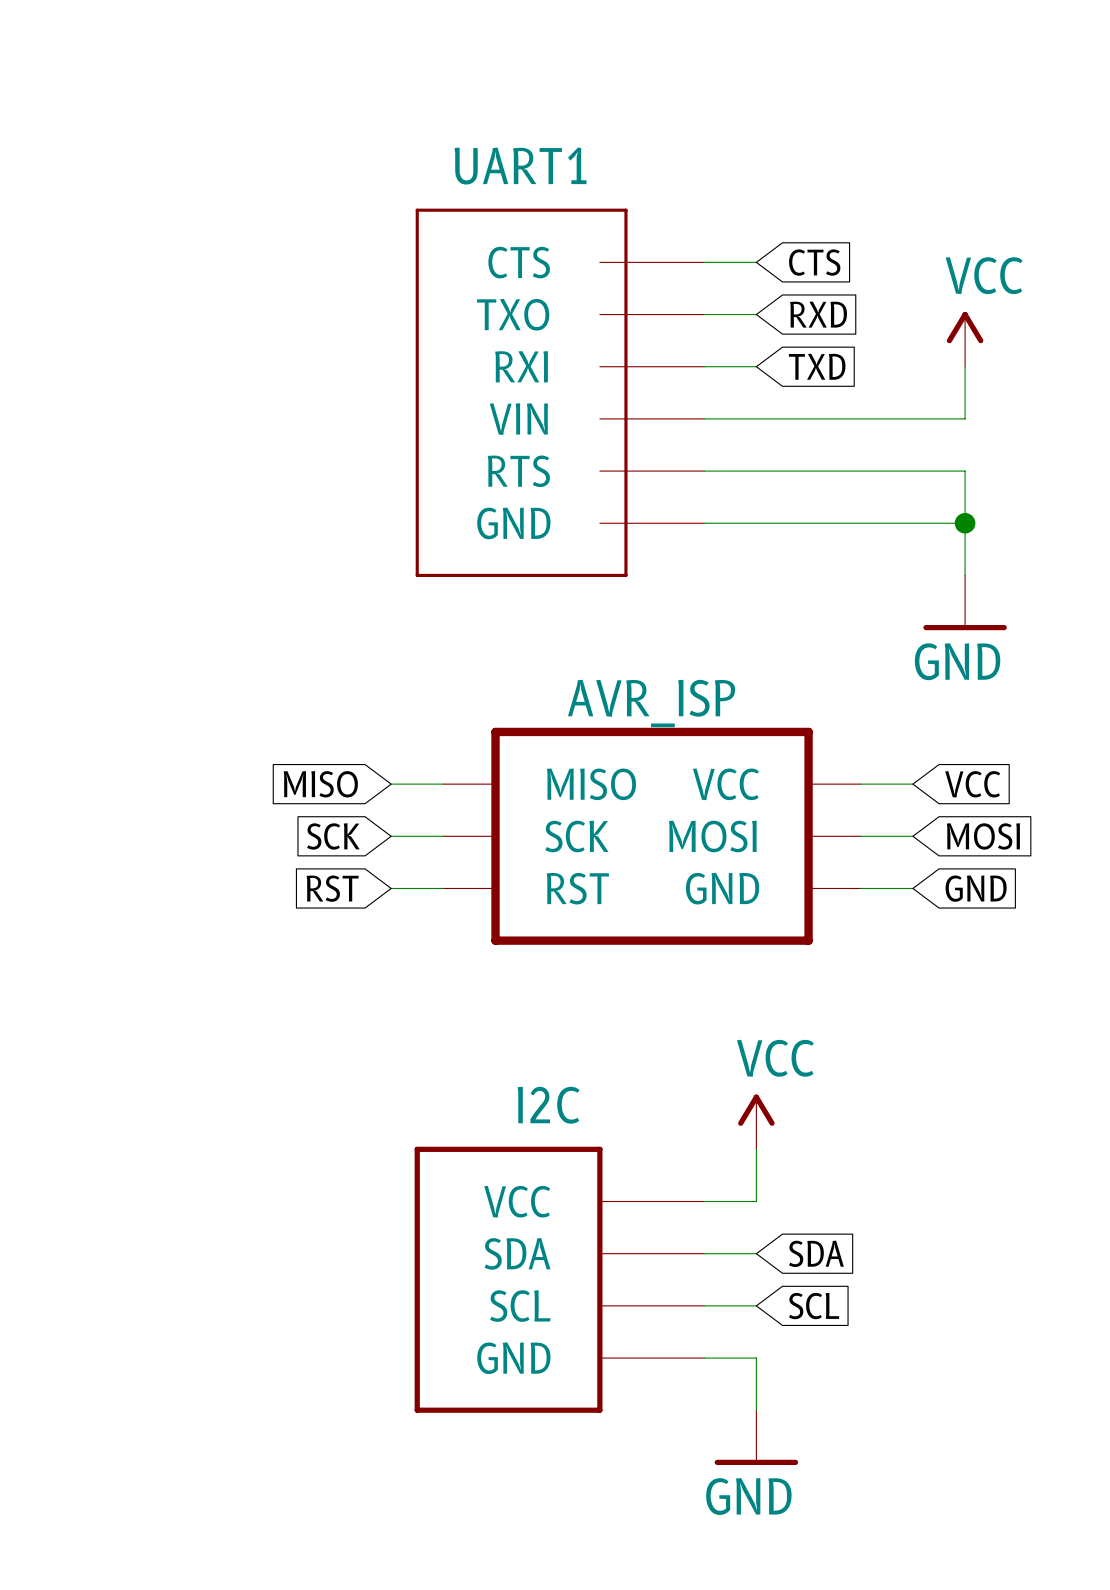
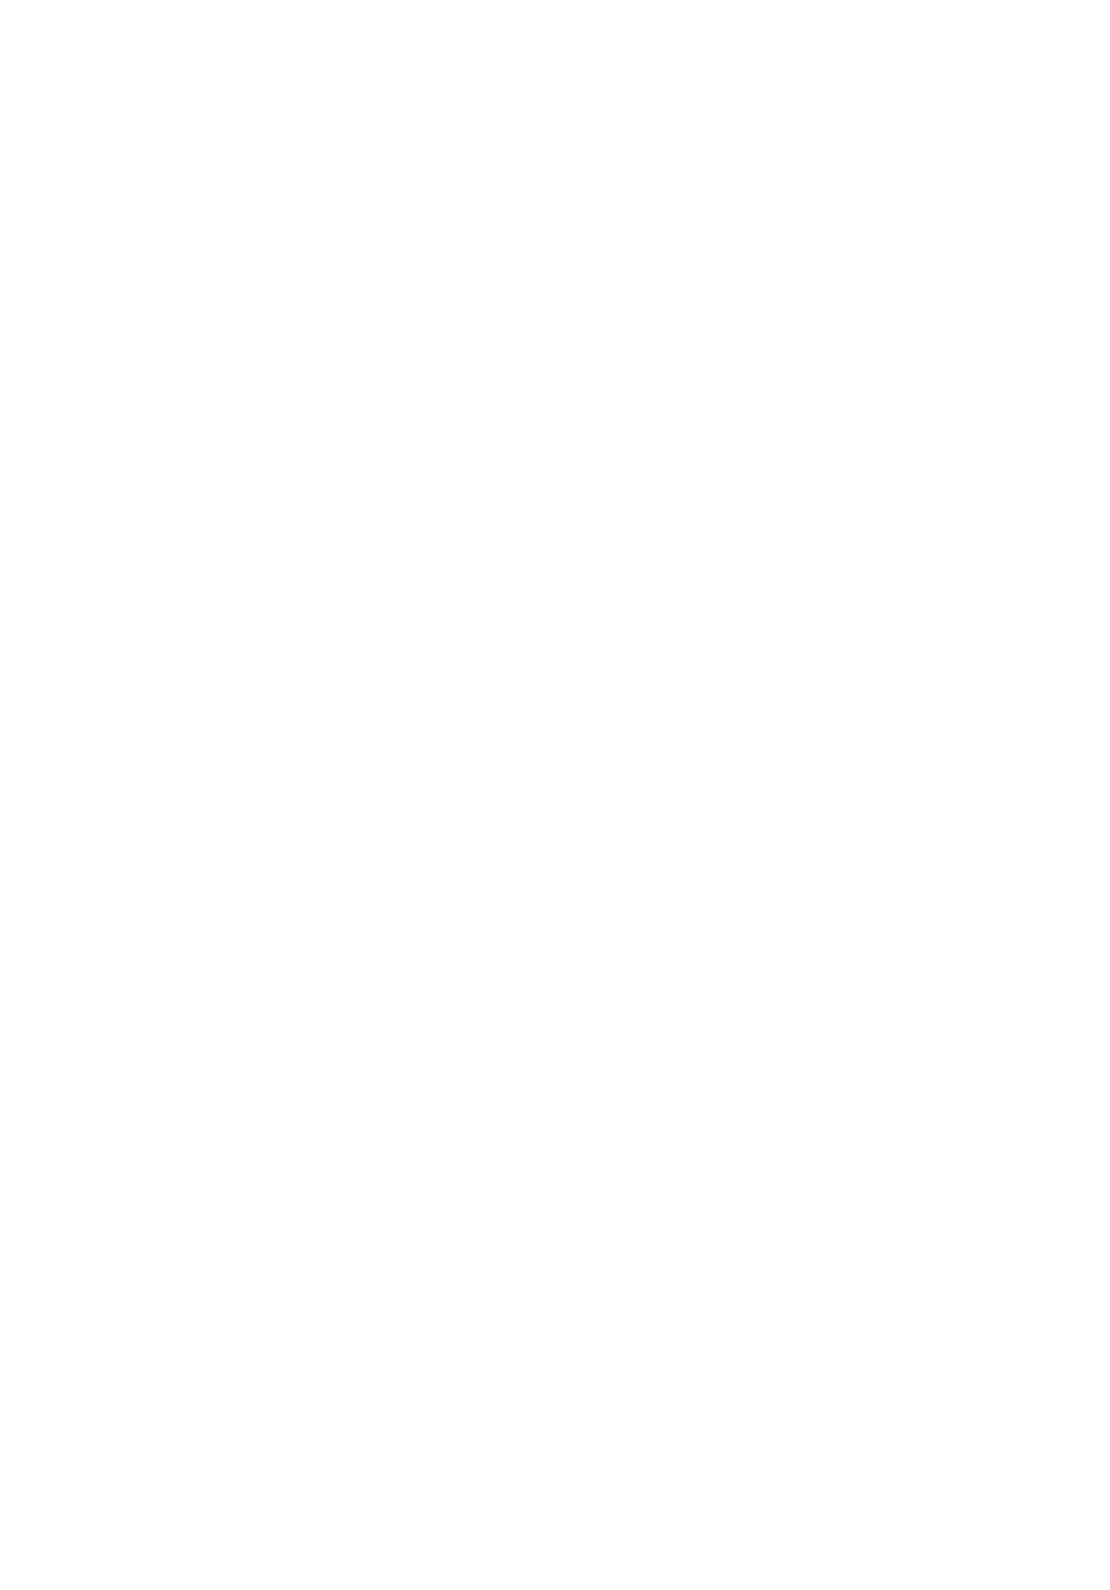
wire: (704, 262) (756, 262) -> none
global label: CTS (814, 262) -> none
wire: (704, 314) (756, 314) -> none
global label: RXD (818, 314) -> none
power symbol: VCC (965, 339) -> none
wire: (704, 366) (756, 366) -> none
global label: TXD (817, 366) -> none
wire: (965, 366) (965, 418) (704, 418) -> none
UART1: (559, 392) -> none
wire: (704, 471) (965, 471) (965, 575) -> none
wire: (704, 523) (965, 523) -> none
junction: (965, 523) -> none
power symbol: GND (965, 602) -> none
global label: MISO (320, 784) -> none
wire: (391, 784) (443, 784) -> none
wire: (860, 784) (912, 784) -> none
global label: VCC (972, 784) -> none
global label: SCK (333, 836) -> none
wire: (391, 836) (443, 836) -> none
AVR_ISP: (652, 836) -> none
wire: (860, 836) (912, 836) -> none
global label: MOSI (983, 836) -> none
global label: RST (332, 888) -> none
wire: (391, 888) (443, 888) -> none
wire: (860, 888) (912, 888) -> none
global label: GND (976, 888) -> none
power symbol: VCC (756, 1121) -> none
wire: (756, 1149) (756, 1201) (704, 1201) -> none
wire: (704, 1253) (756, 1253) -> none
global label: SDA (816, 1253) -> none
I2C: (559, 1279) -> none
wire: (704, 1305) (756, 1305) -> none
global label: SCL (814, 1306) -> none
wire: (704, 1358) (756, 1358) (756, 1410) -> none
power symbol: GND (756, 1437) -> none

